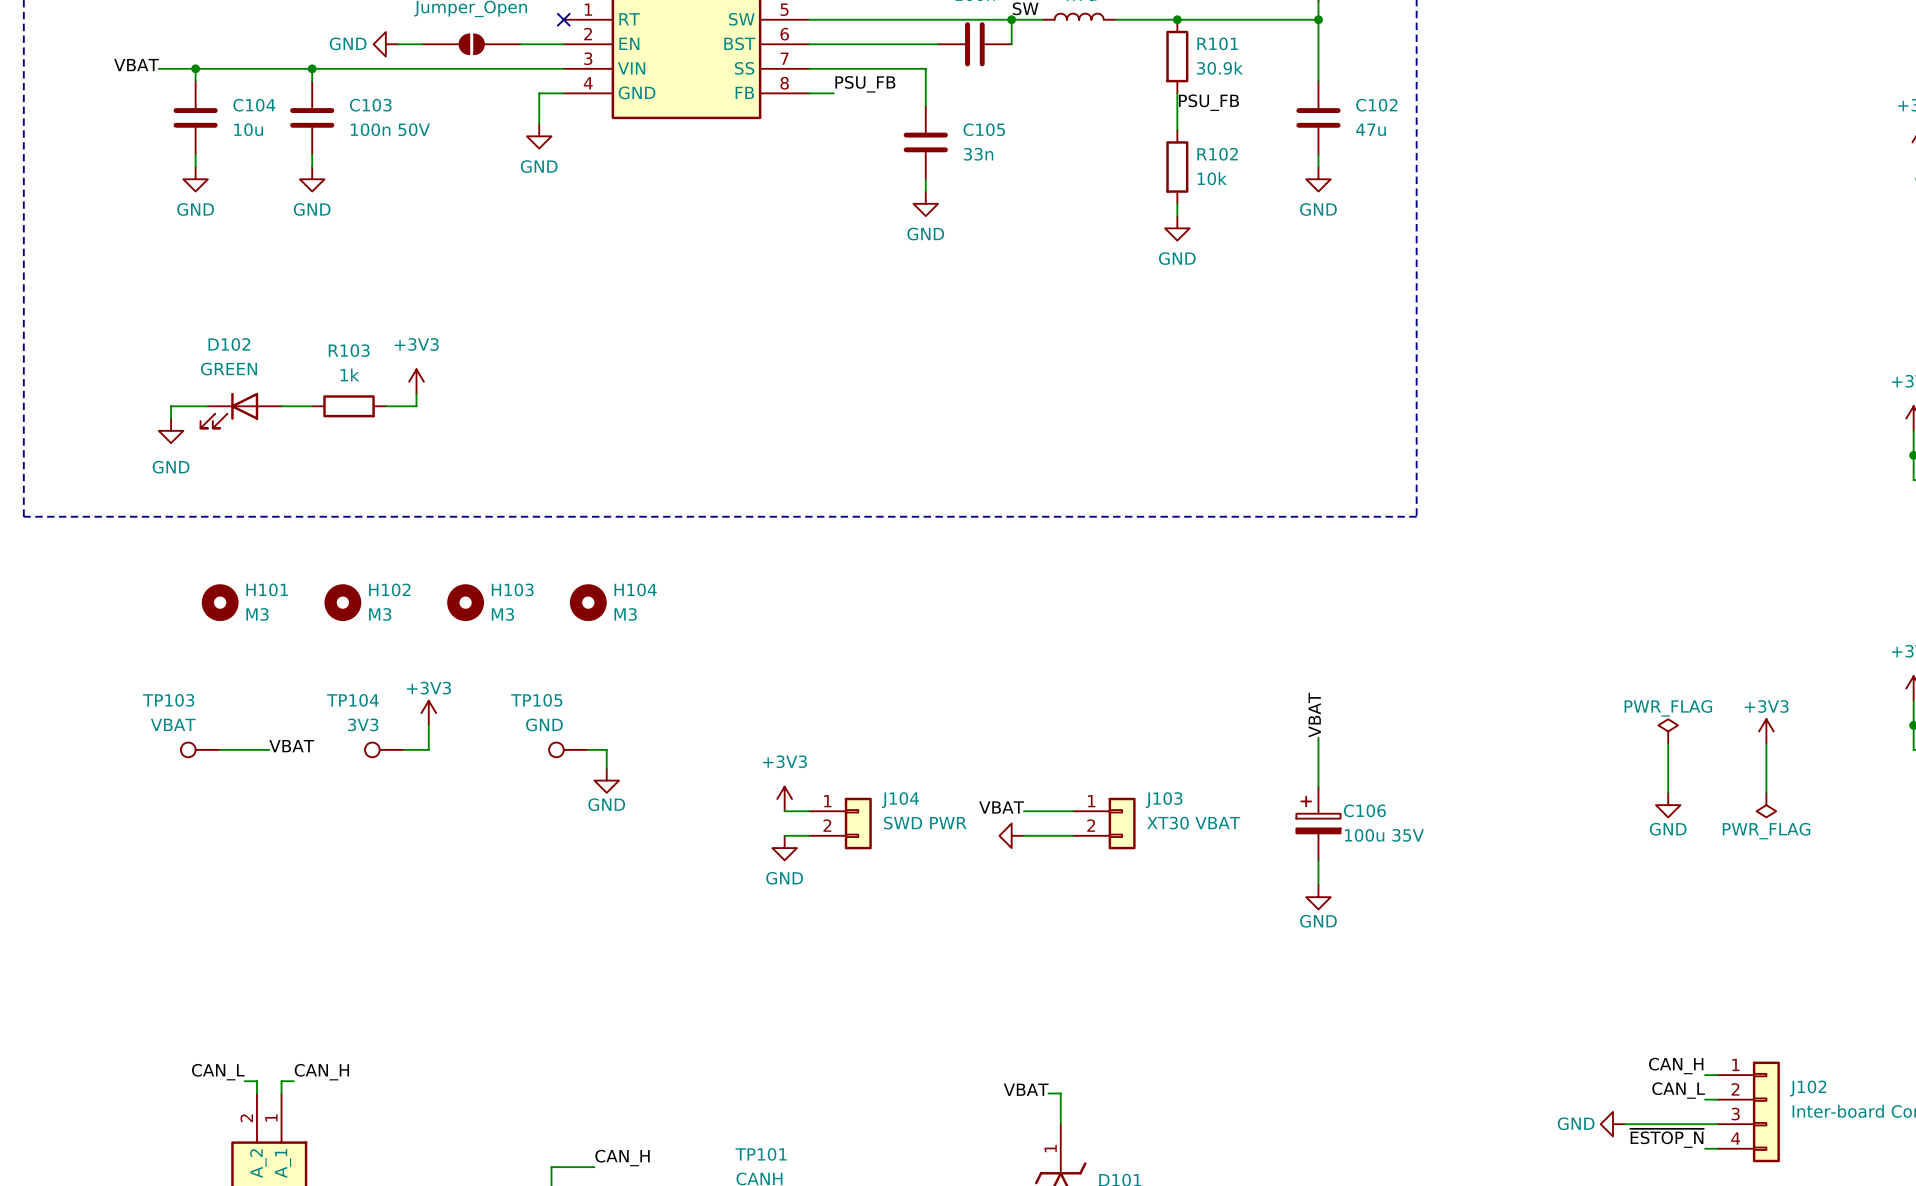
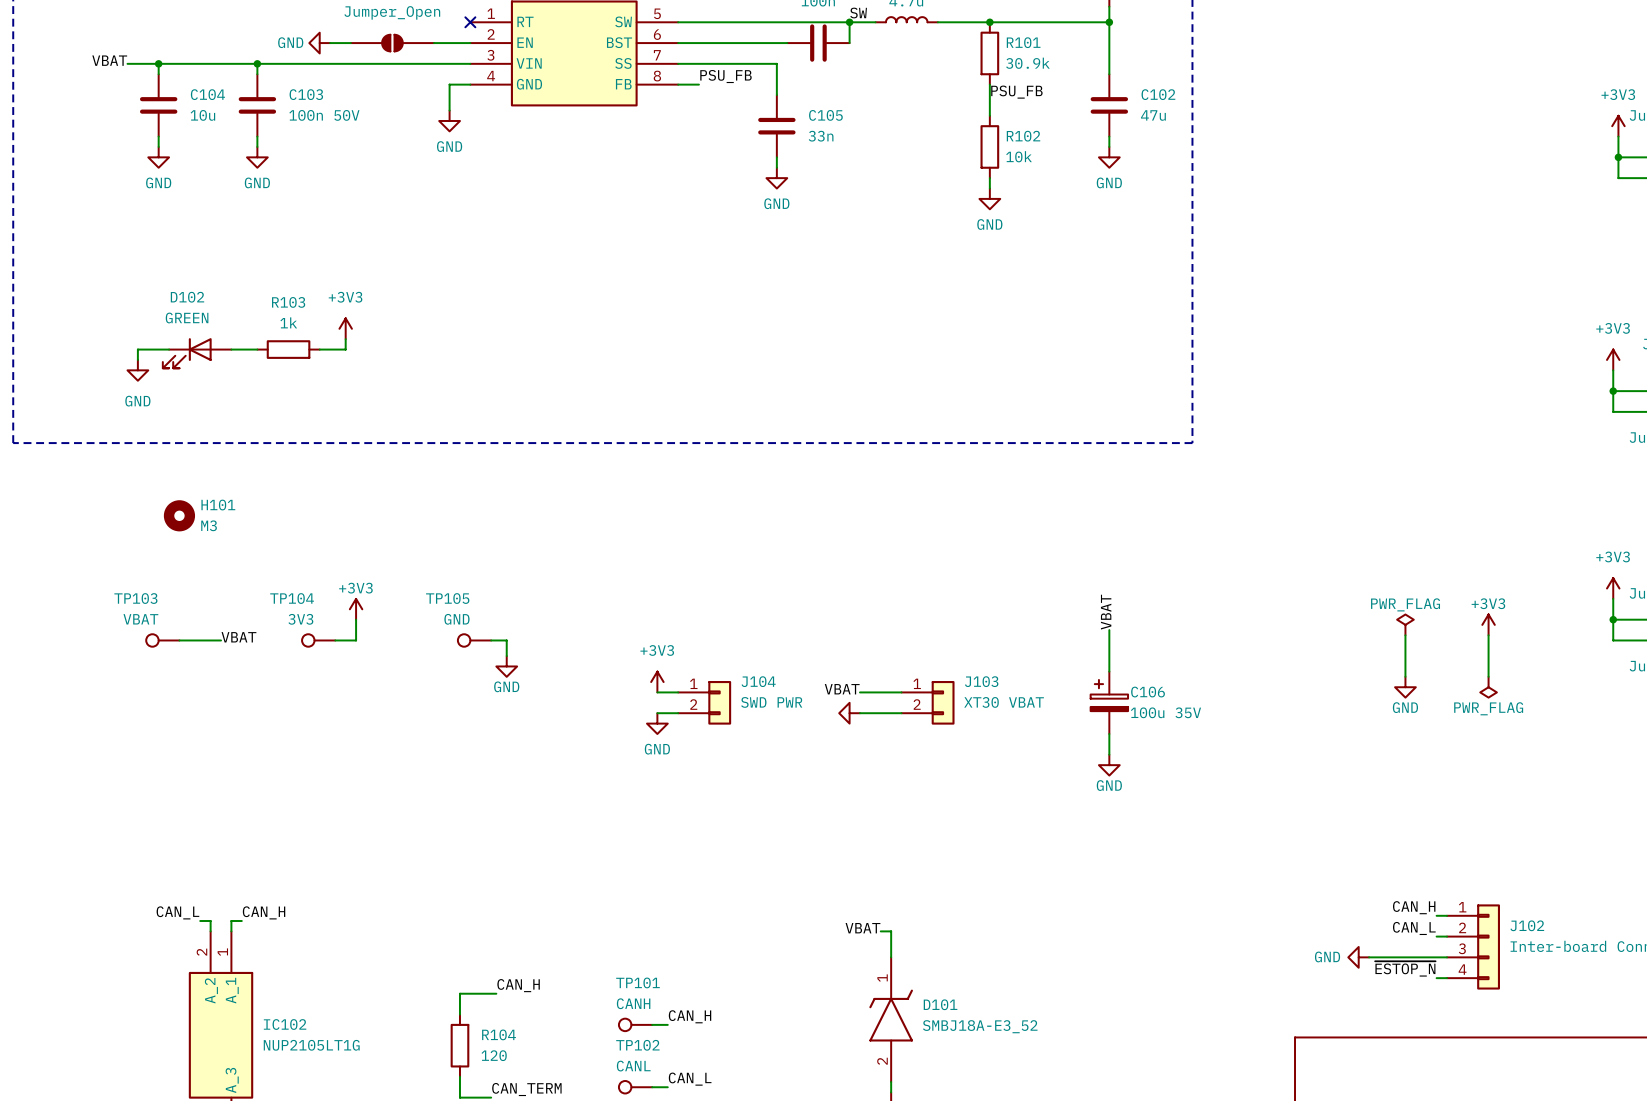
H102: M3 (342, 602) -> none
H103: M3 (465, 602) -> none
H104: M3 (588, 602) -> none

